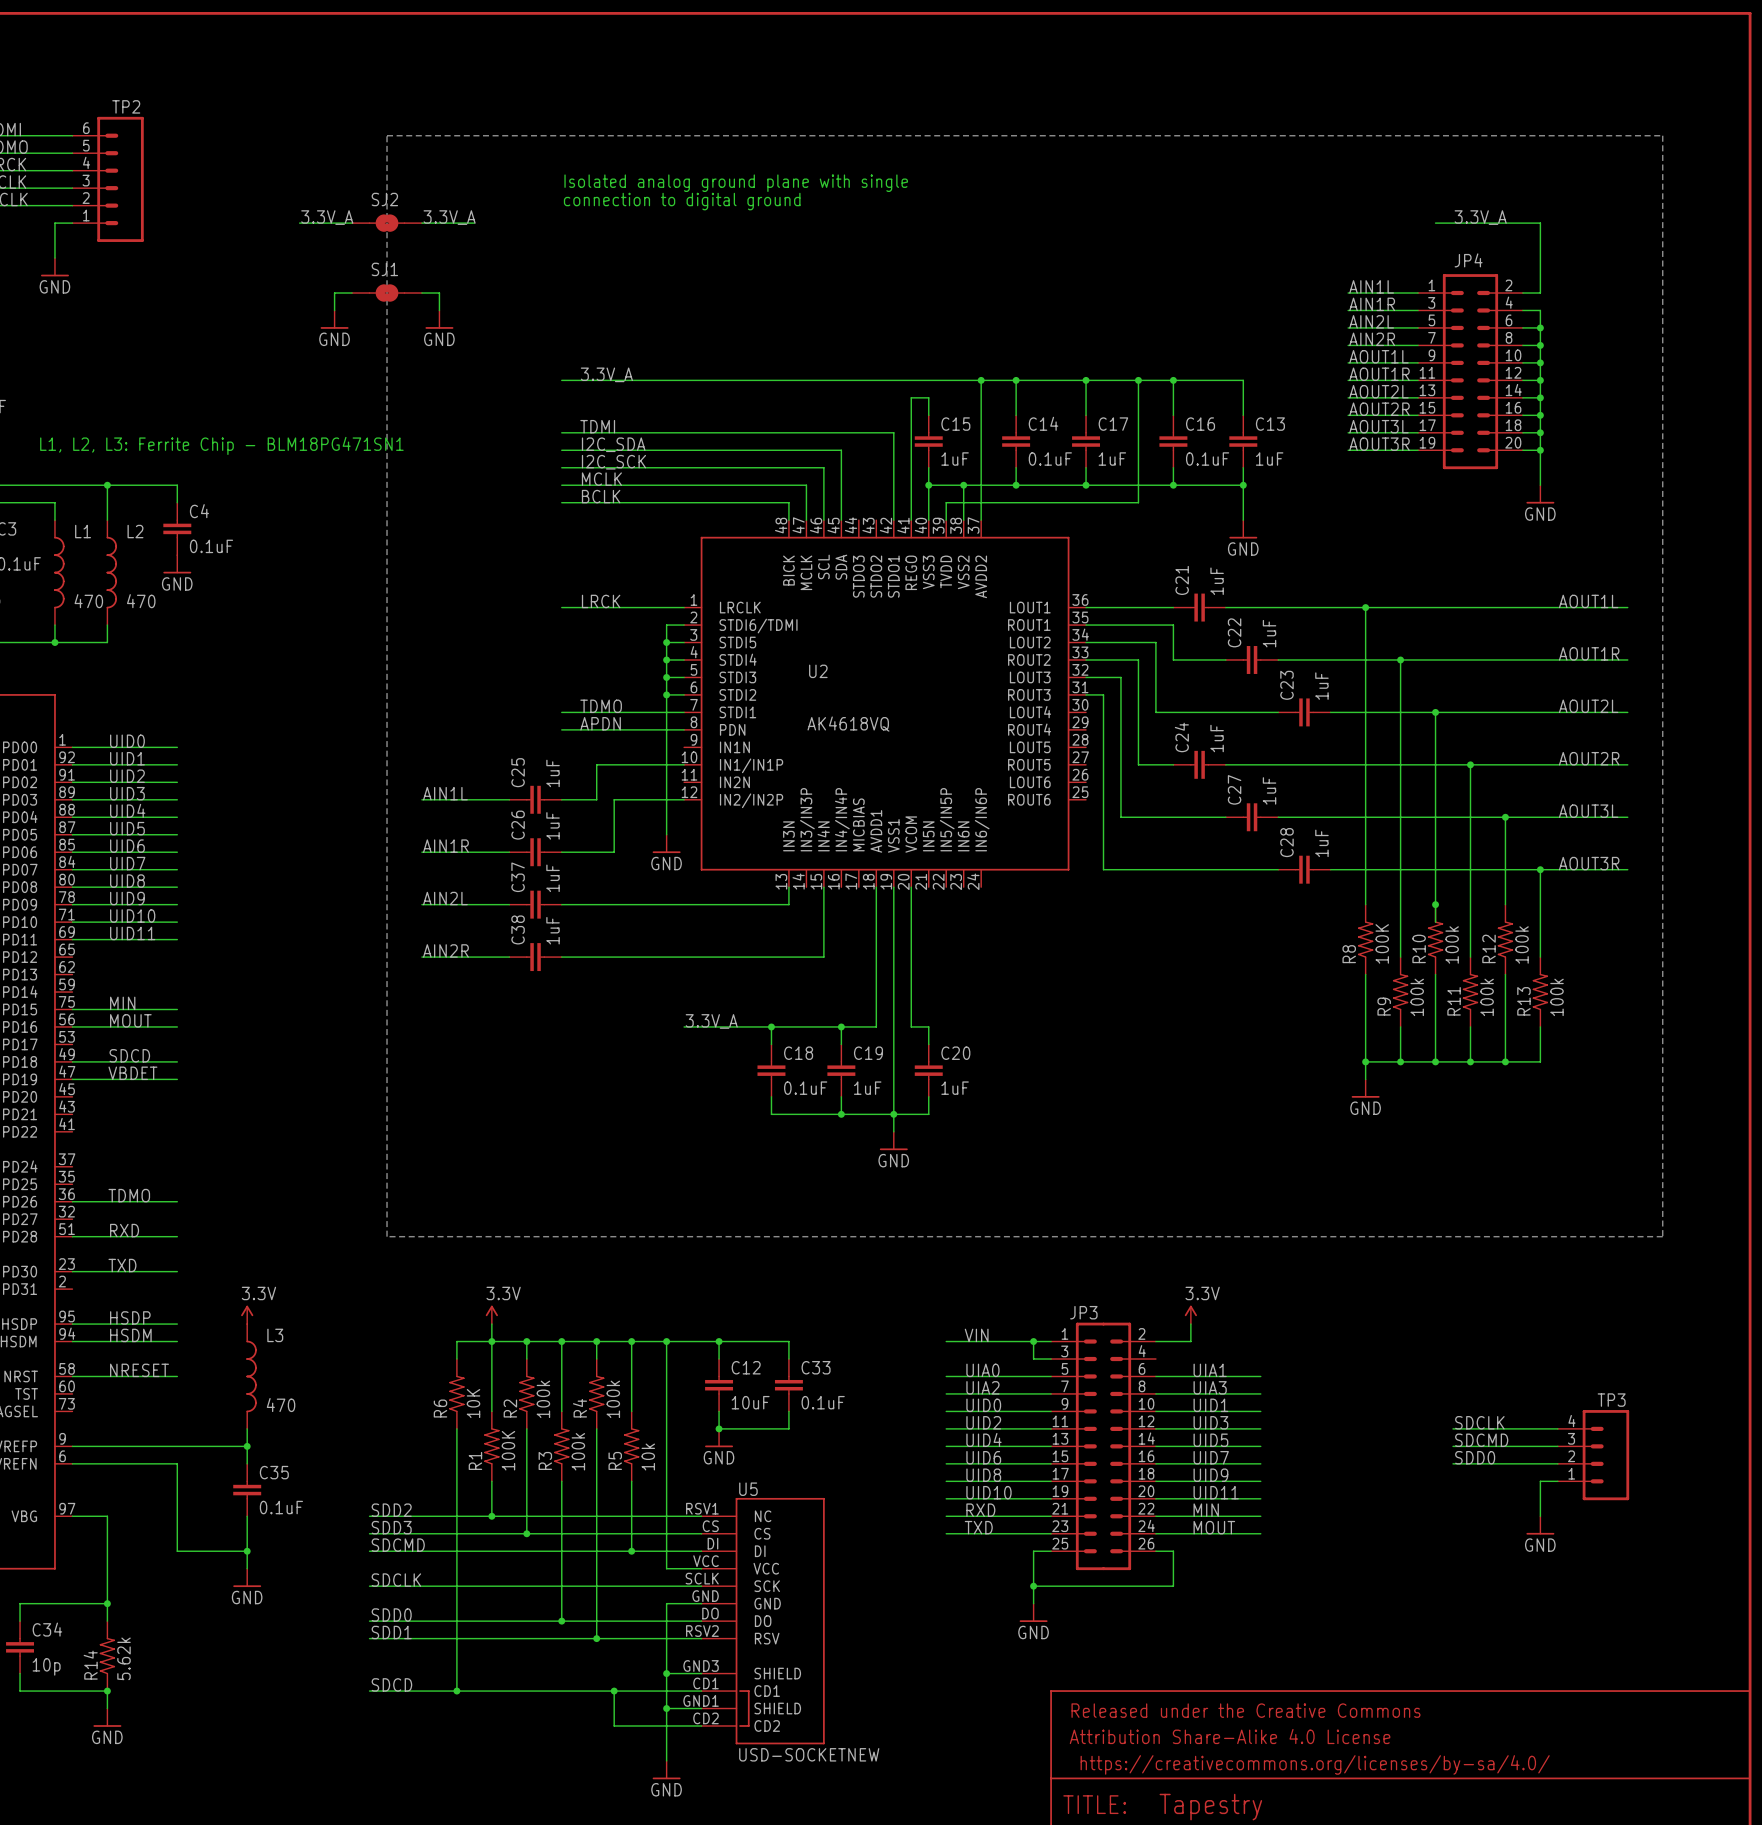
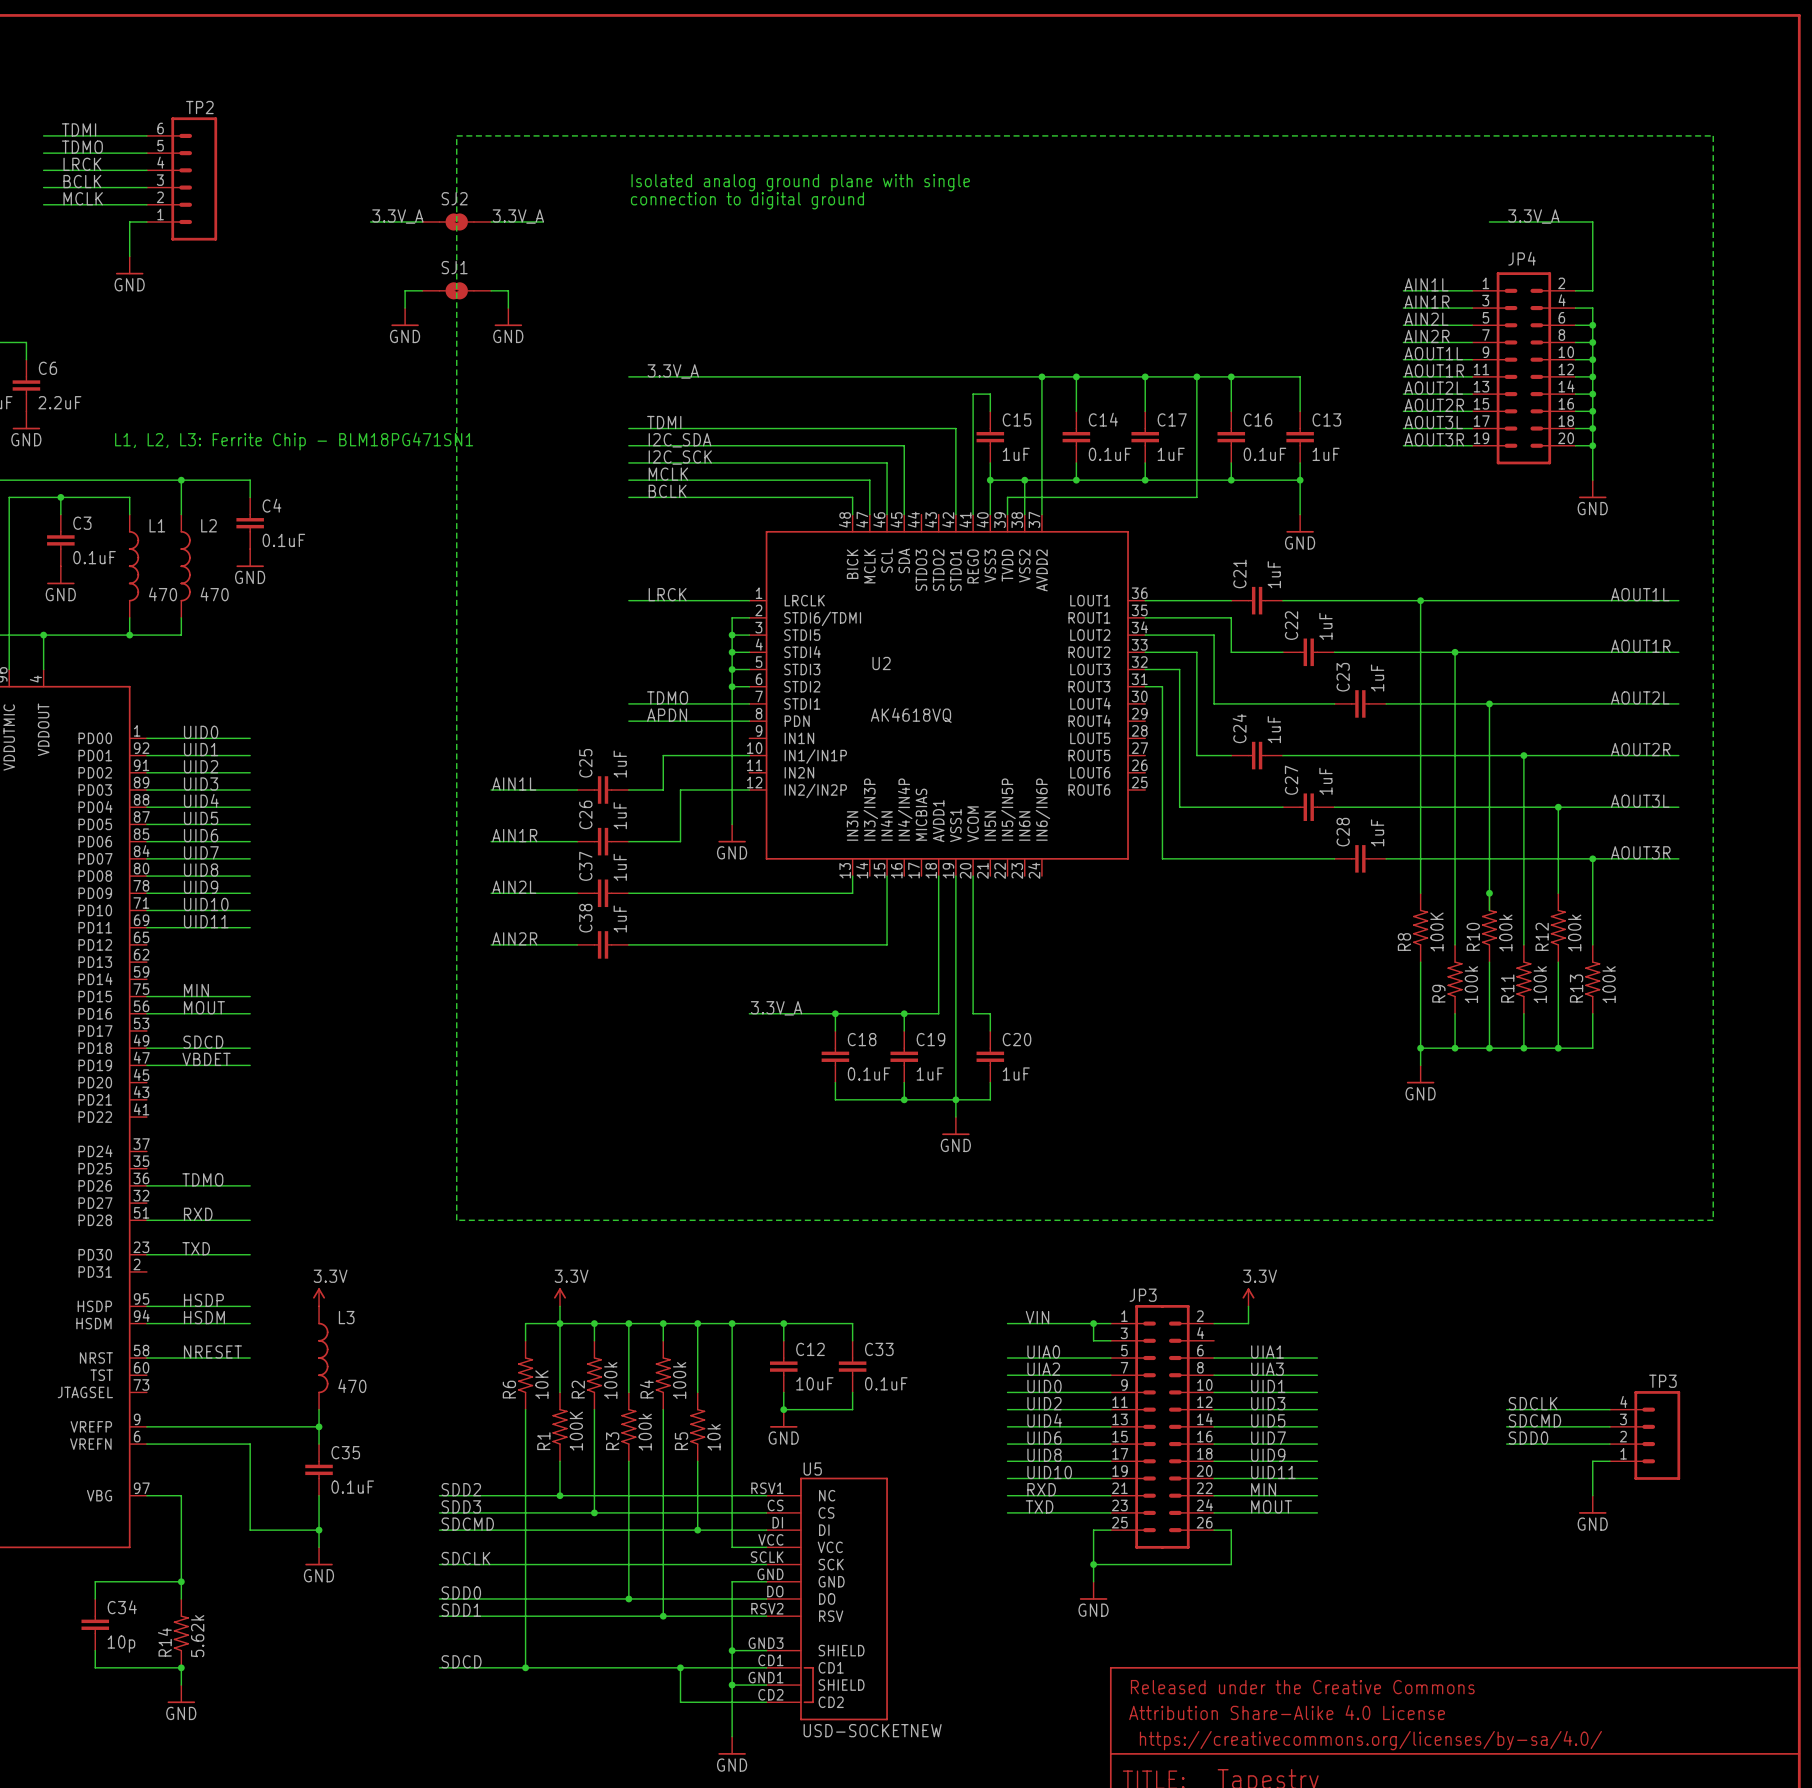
line: (387, 135) (1662, 135) (1662, 1236) (387, 1236) (387, 135) -> none

